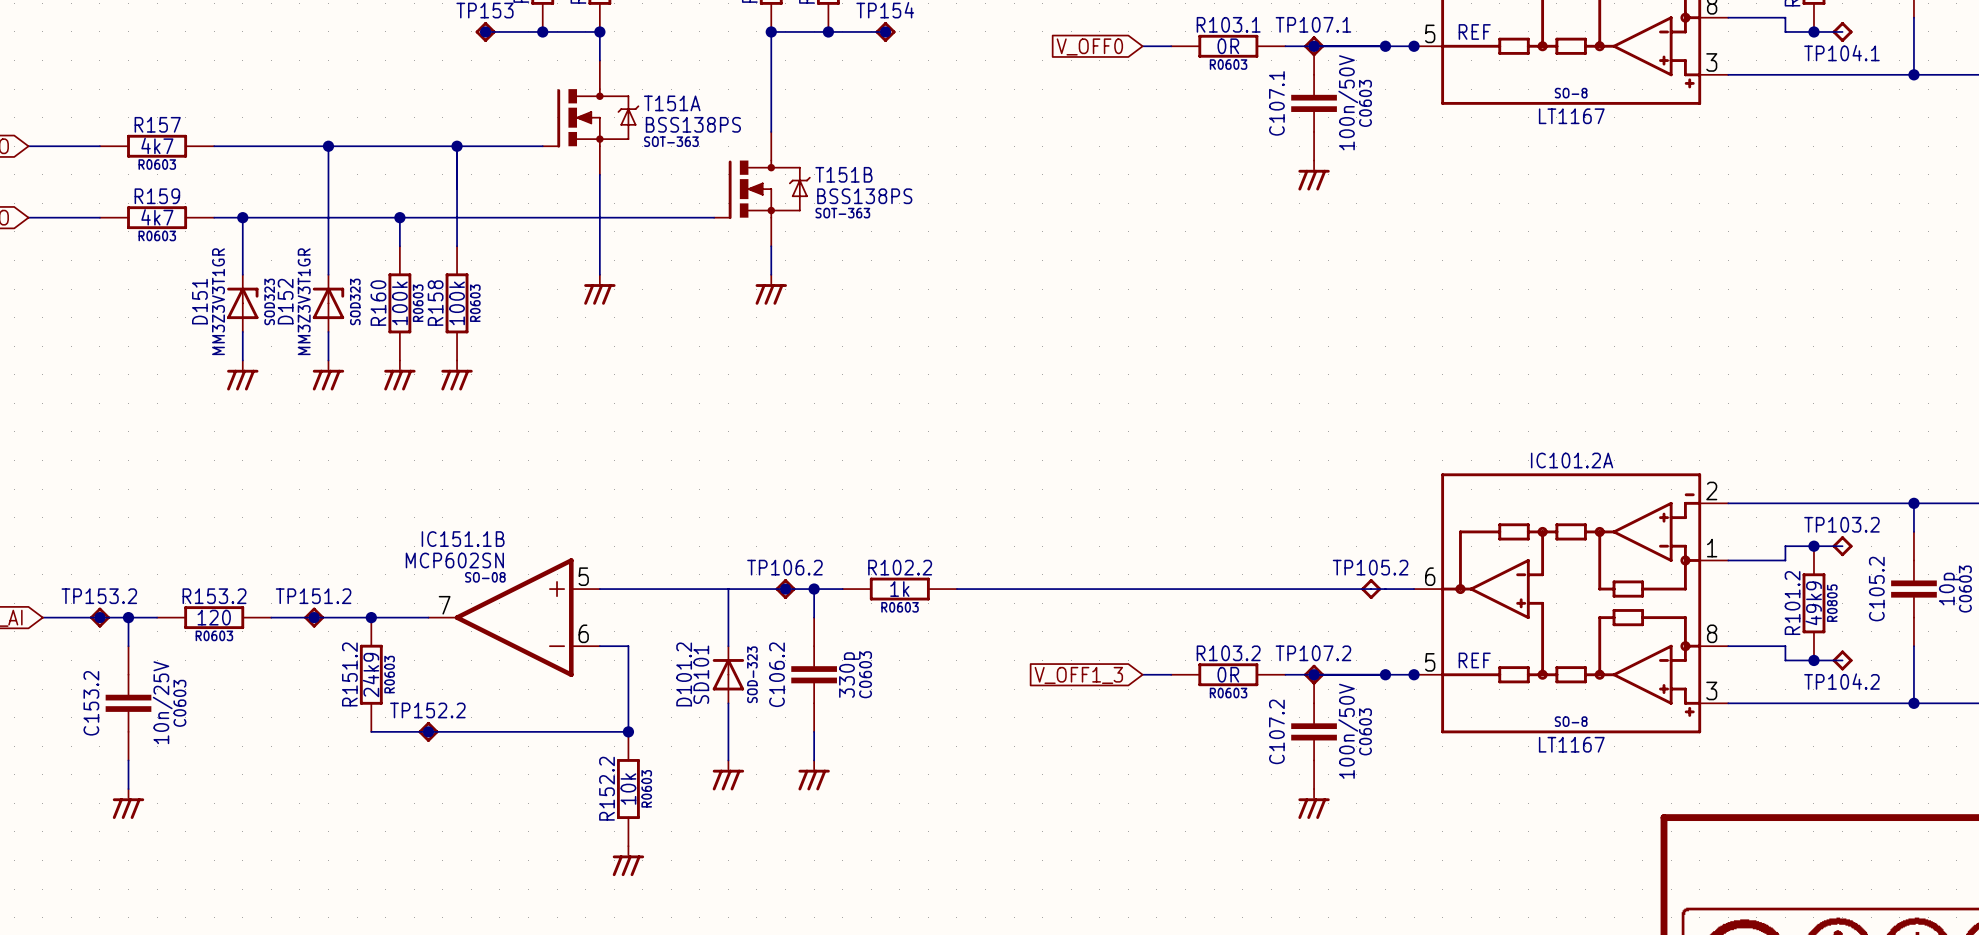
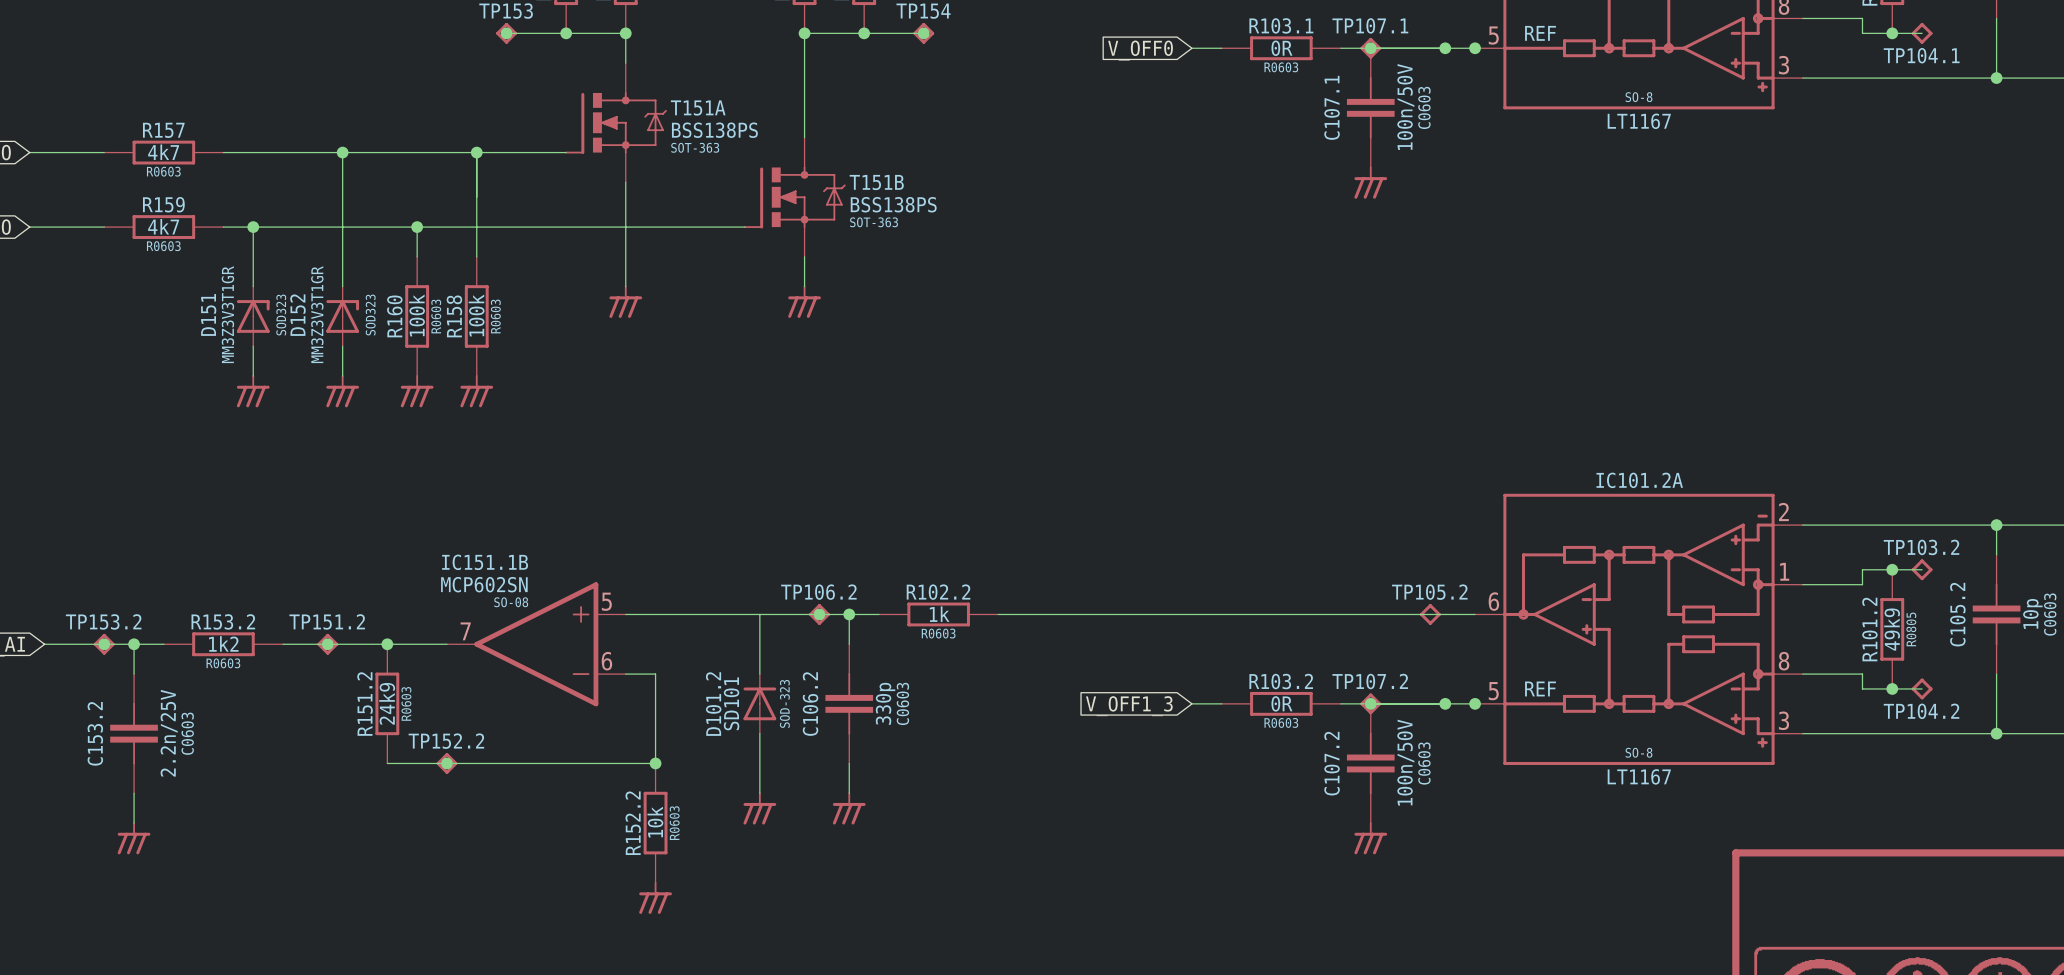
R153.2 value: 120 (214, 617) -> 1k2 (223, 643)
C153.2 value: 10n/25V (162, 702) -> 2.2n/25V (169, 733)

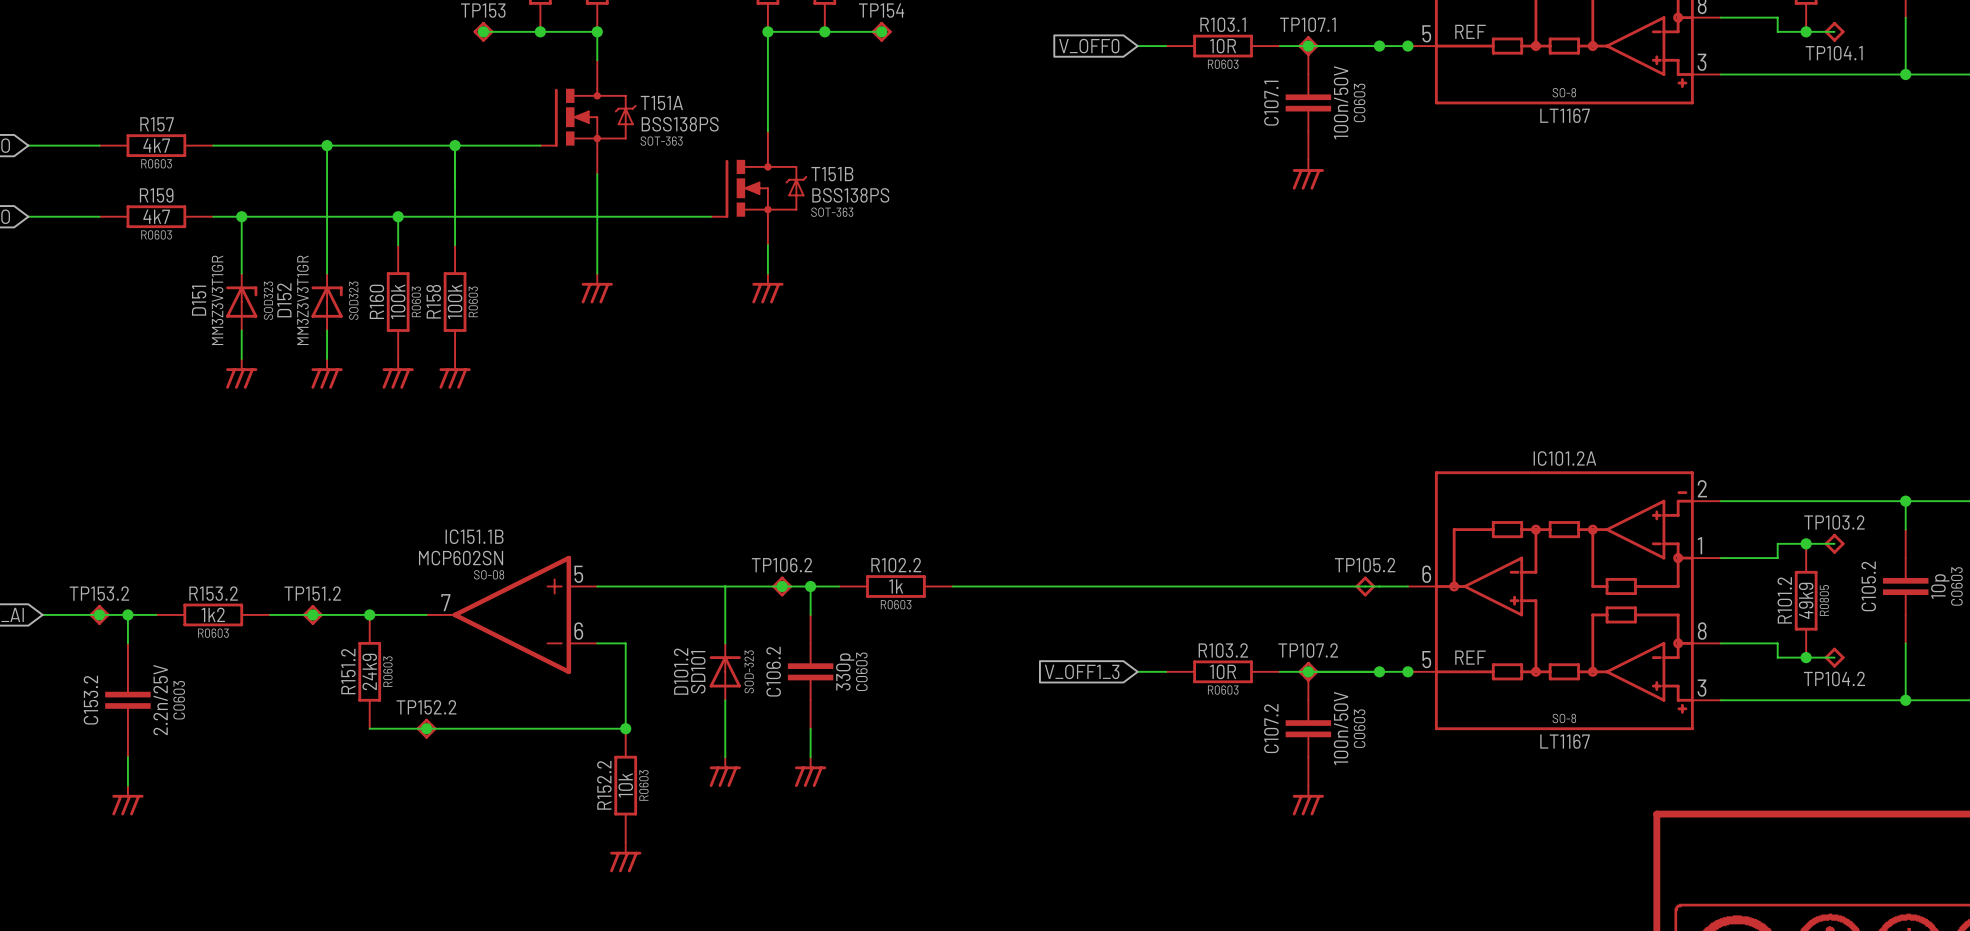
R103.1 value: 0R (1281, 48) -> 10R (1223, 46)
R103.2 value: 0R (1281, 703) -> 10R (1223, 671)

